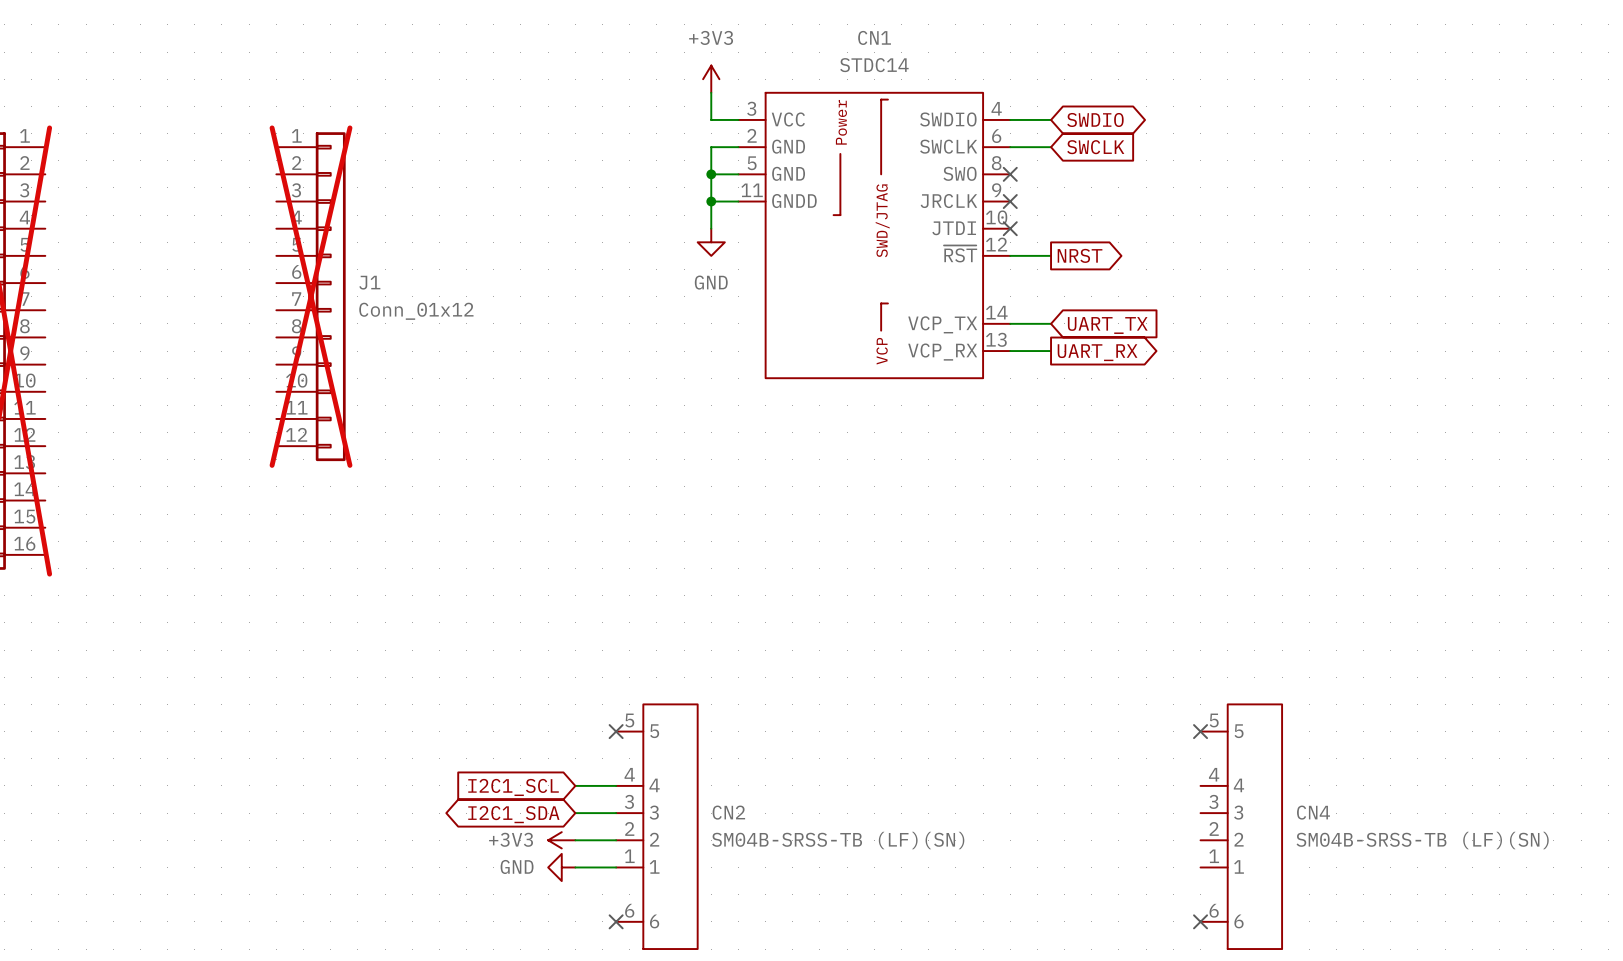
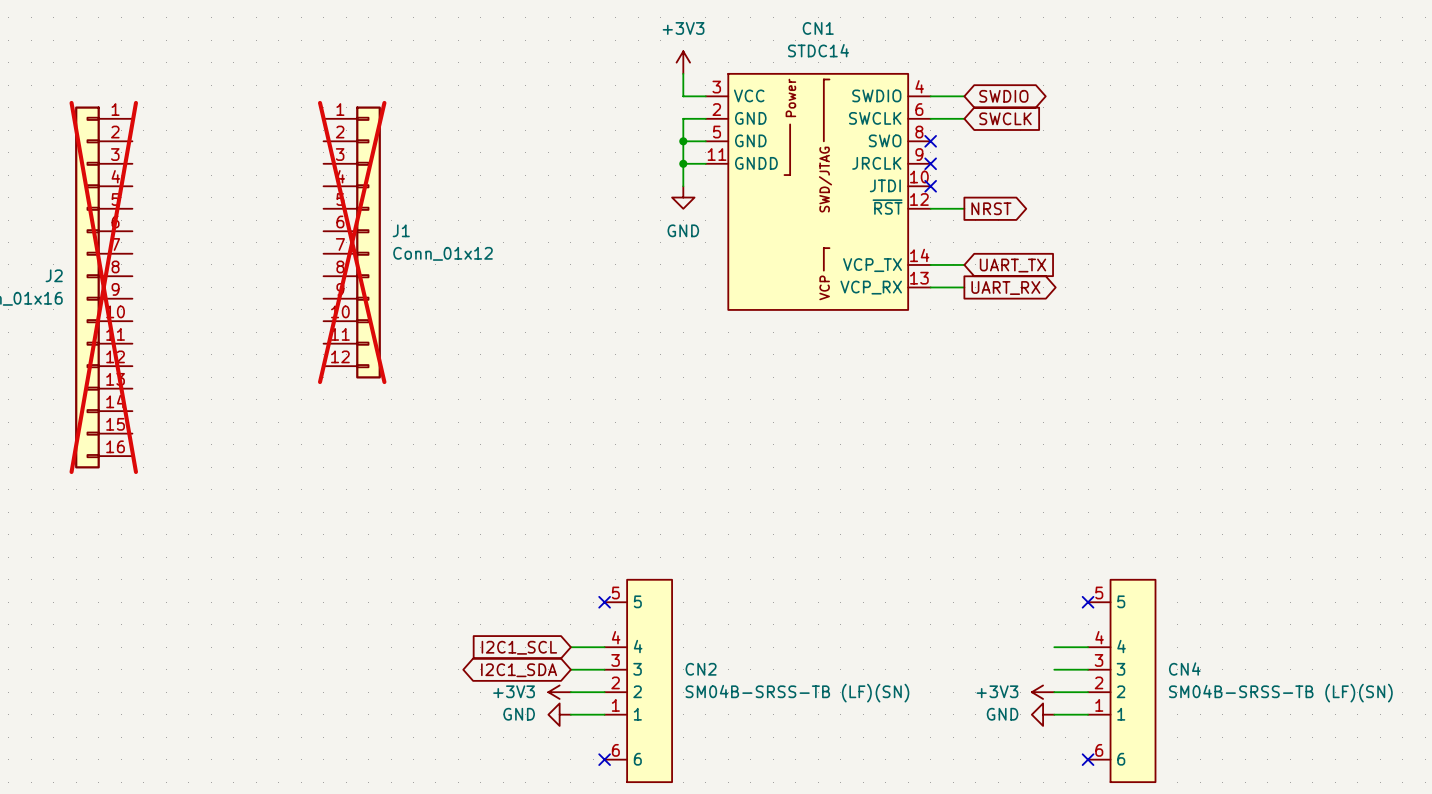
wire: none -> (1054, 647) (1088, 647)
wire: none -> (1054, 669) (1088, 669)
power symbol: none -> +3V3 (1043, 692)
wire: none -> (1054, 692) (1088, 692)
power symbol: none -> GND (1043, 714)
wire: none -> (1054, 714) (1088, 714)

